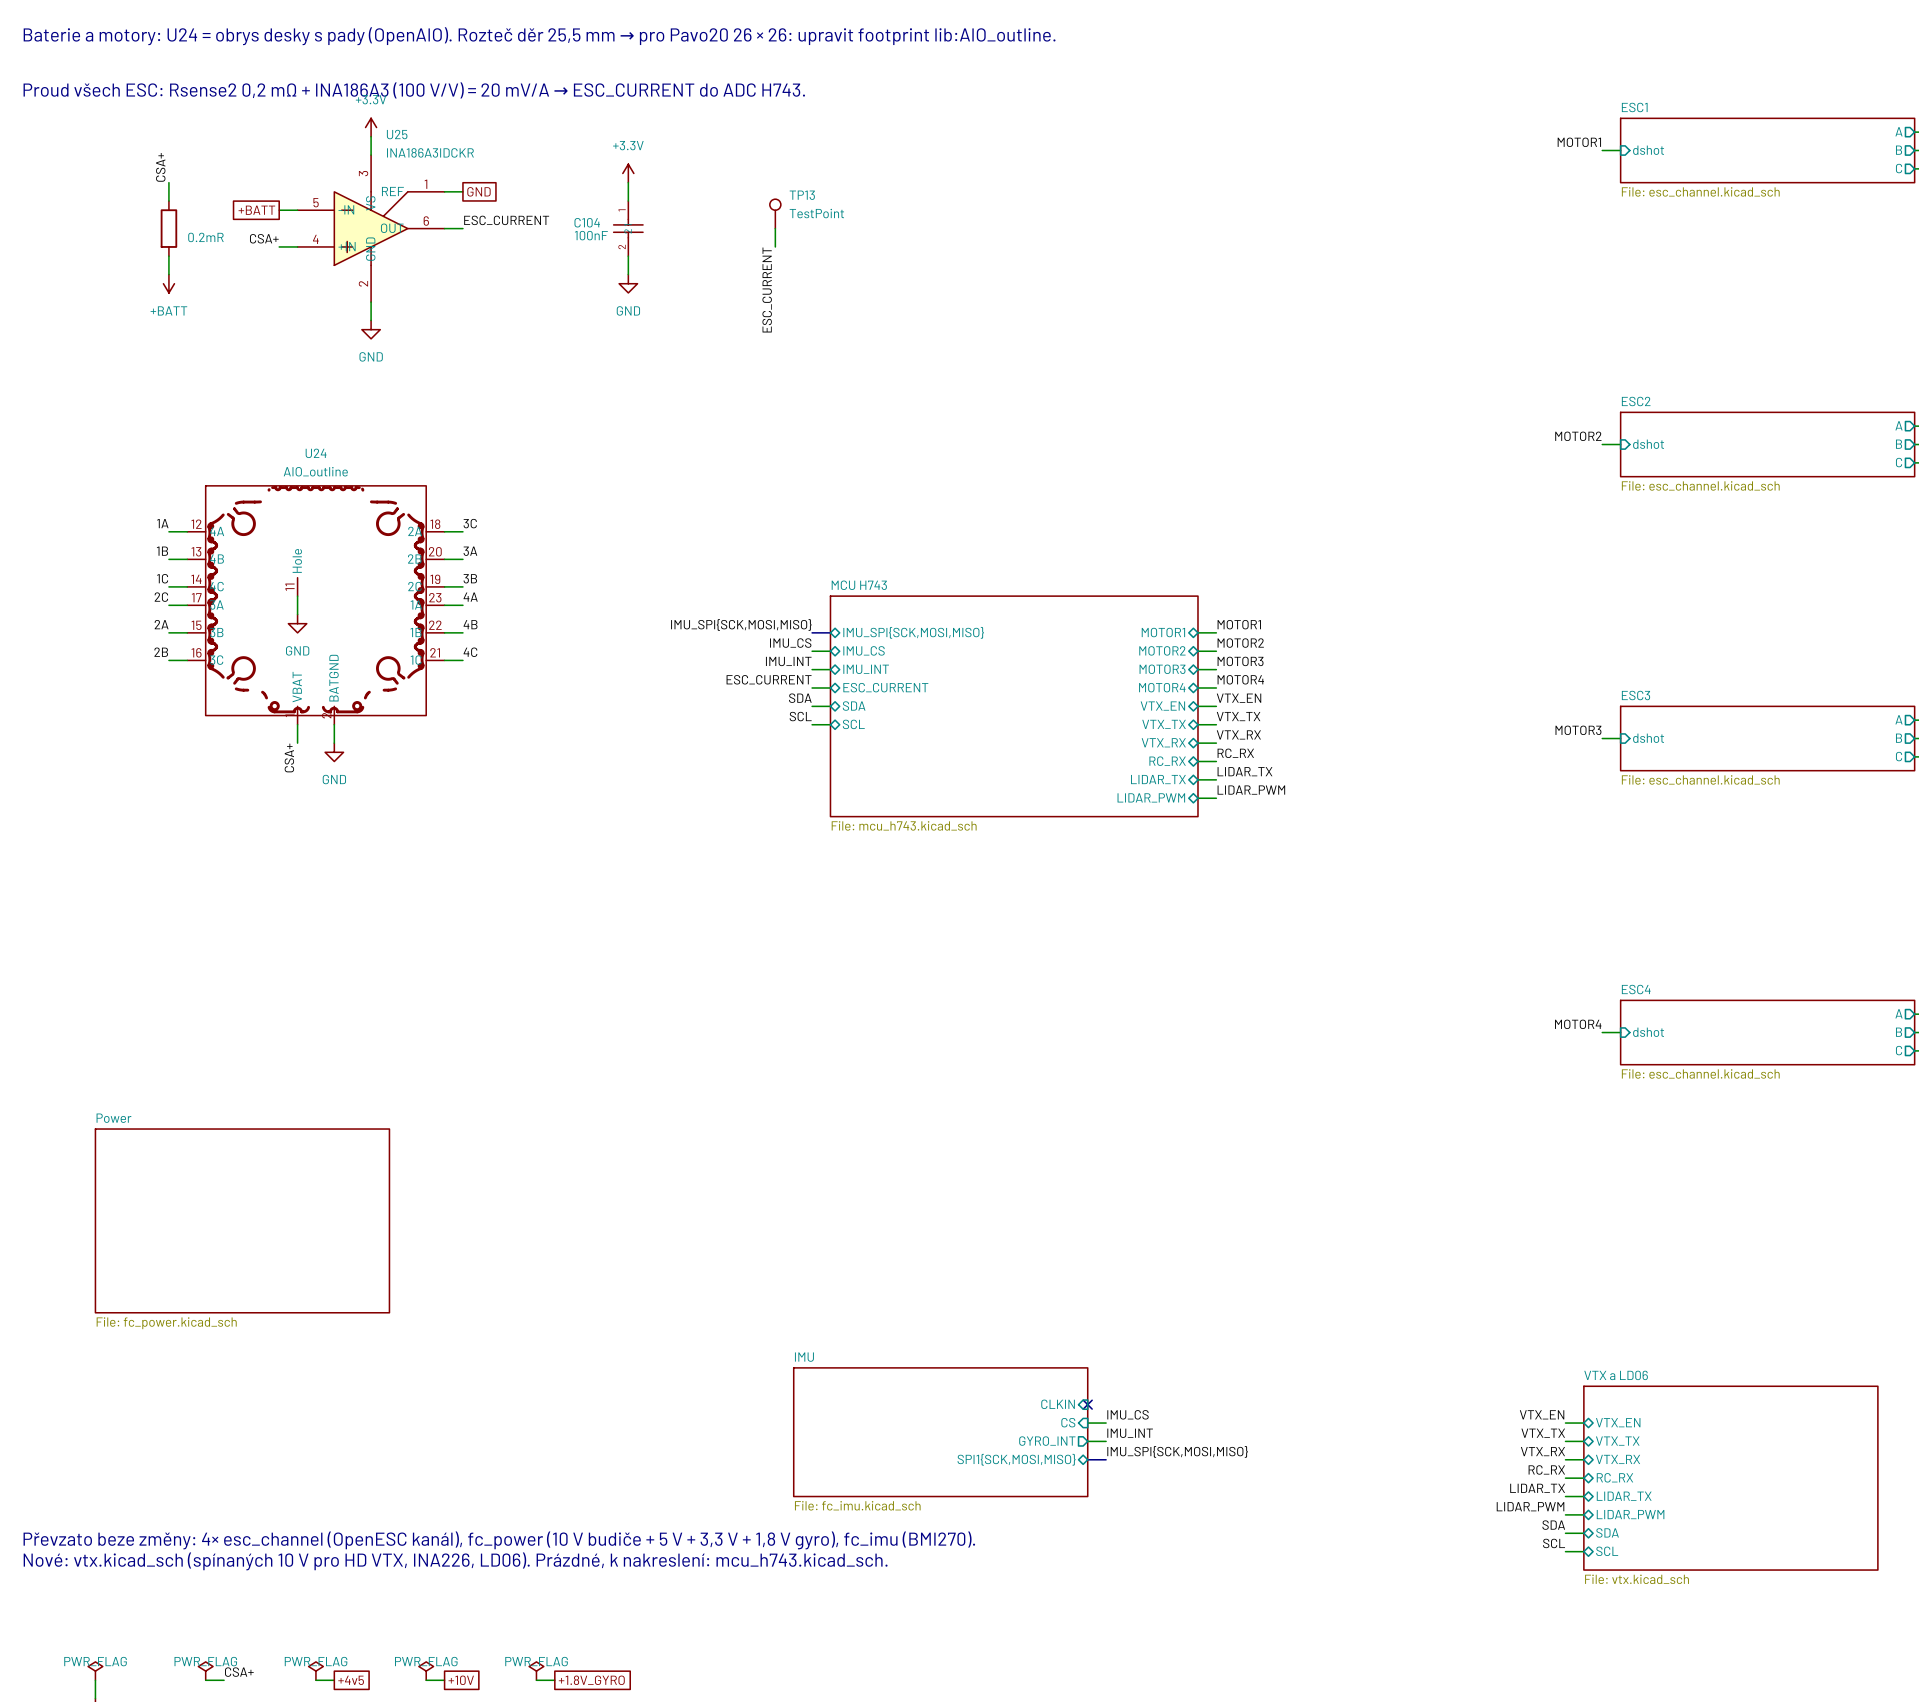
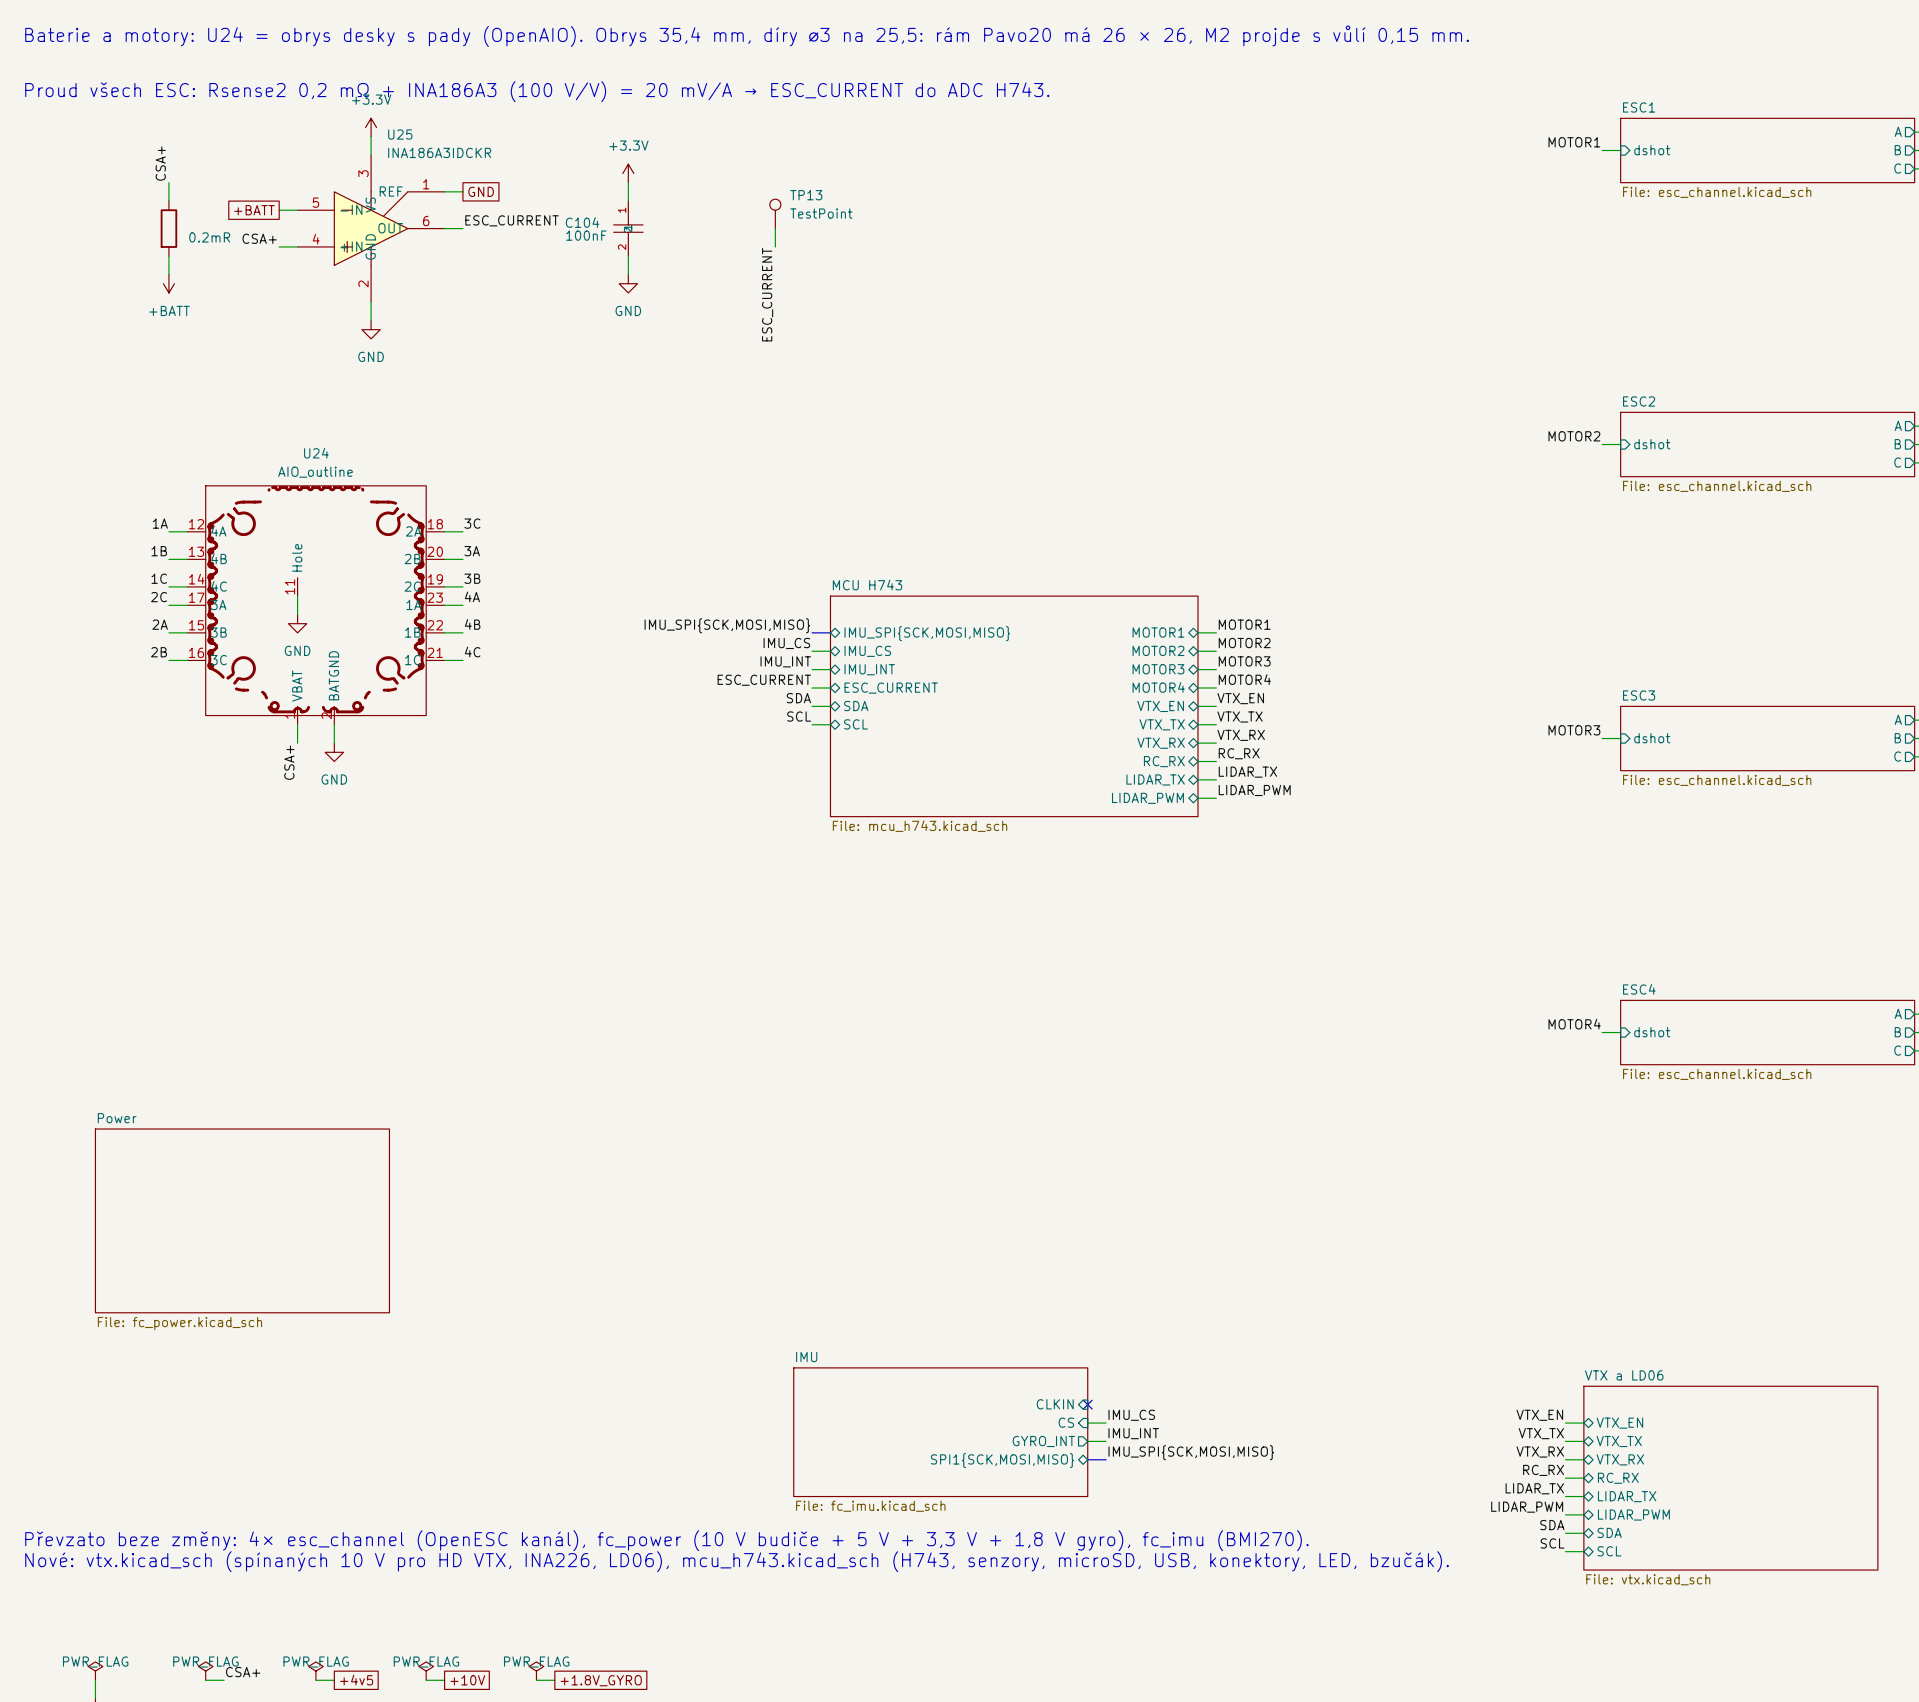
text: Baterie a motory: U24 = obrys desky s pady (OpenAIO). Rozteč děr 25,5 mm → pro Pavo20 26 × 26: upravit footprint lib:AIO_outline. (539, 36) -> Baterie a motory: U24 = obrys desky s pady (OpenAIO). Obrys 35,4 mm, díry ⌀3 na 25,5: rám Pavo20 má 26 × 26, M2 projde s vůlí 0,15 mm. (747, 36)
text: Nové: vtx.kicad_sch (spínaných 10 V pro HD VTX, INA226, LD06). Prázdné, k nakreslení: mcu_h743.kicad_sch. (455, 1561) -> Nové: vtx.kicad_sch (spínaných 10 V pro HD VTX, INA226, LD06), mcu_h743.kicad_sch (H743, senzory, microSD, USB, konektory, LED, bzučák). (737, 1561)

